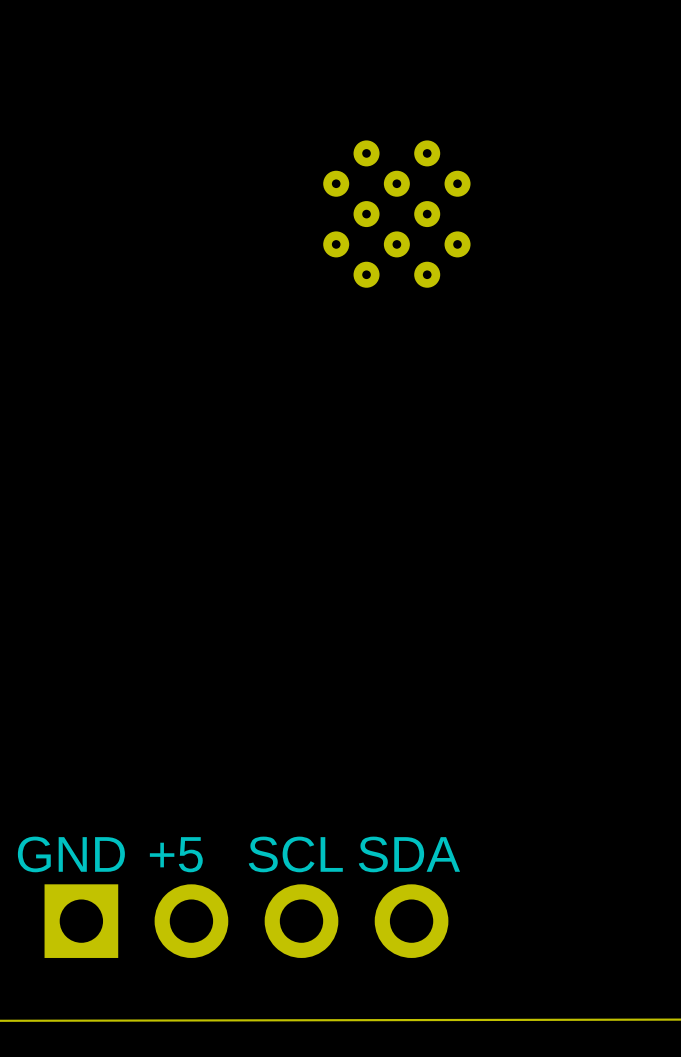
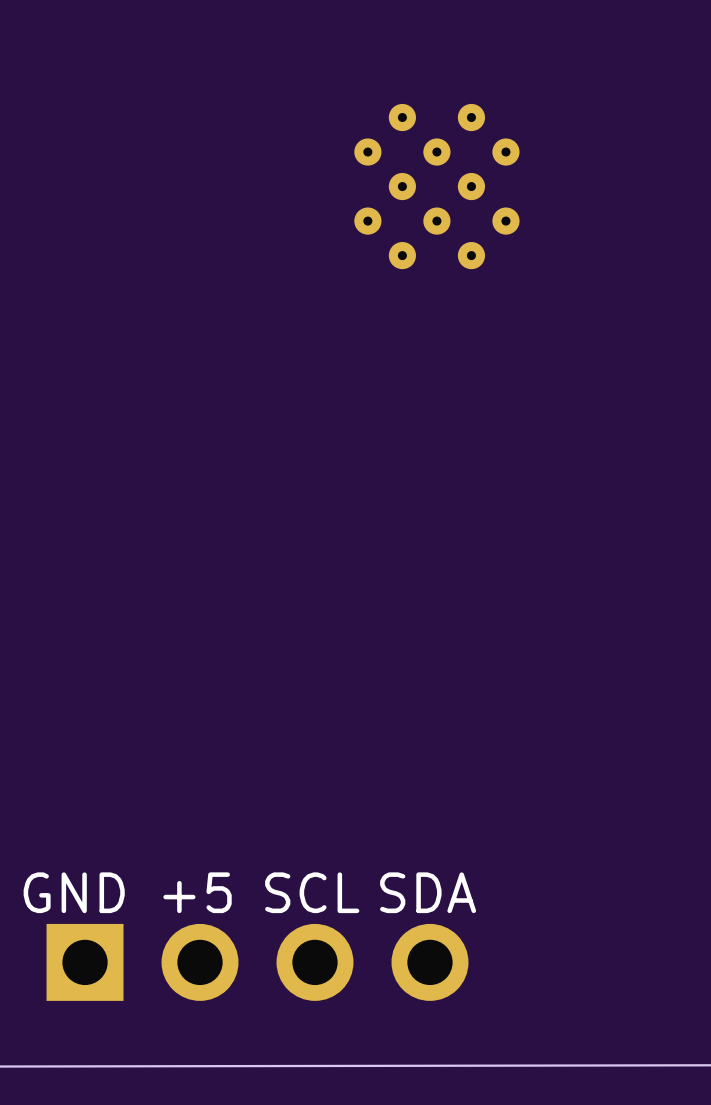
part footprint: [323, 140, 471, 288] -> [354, 103, 520, 270]

